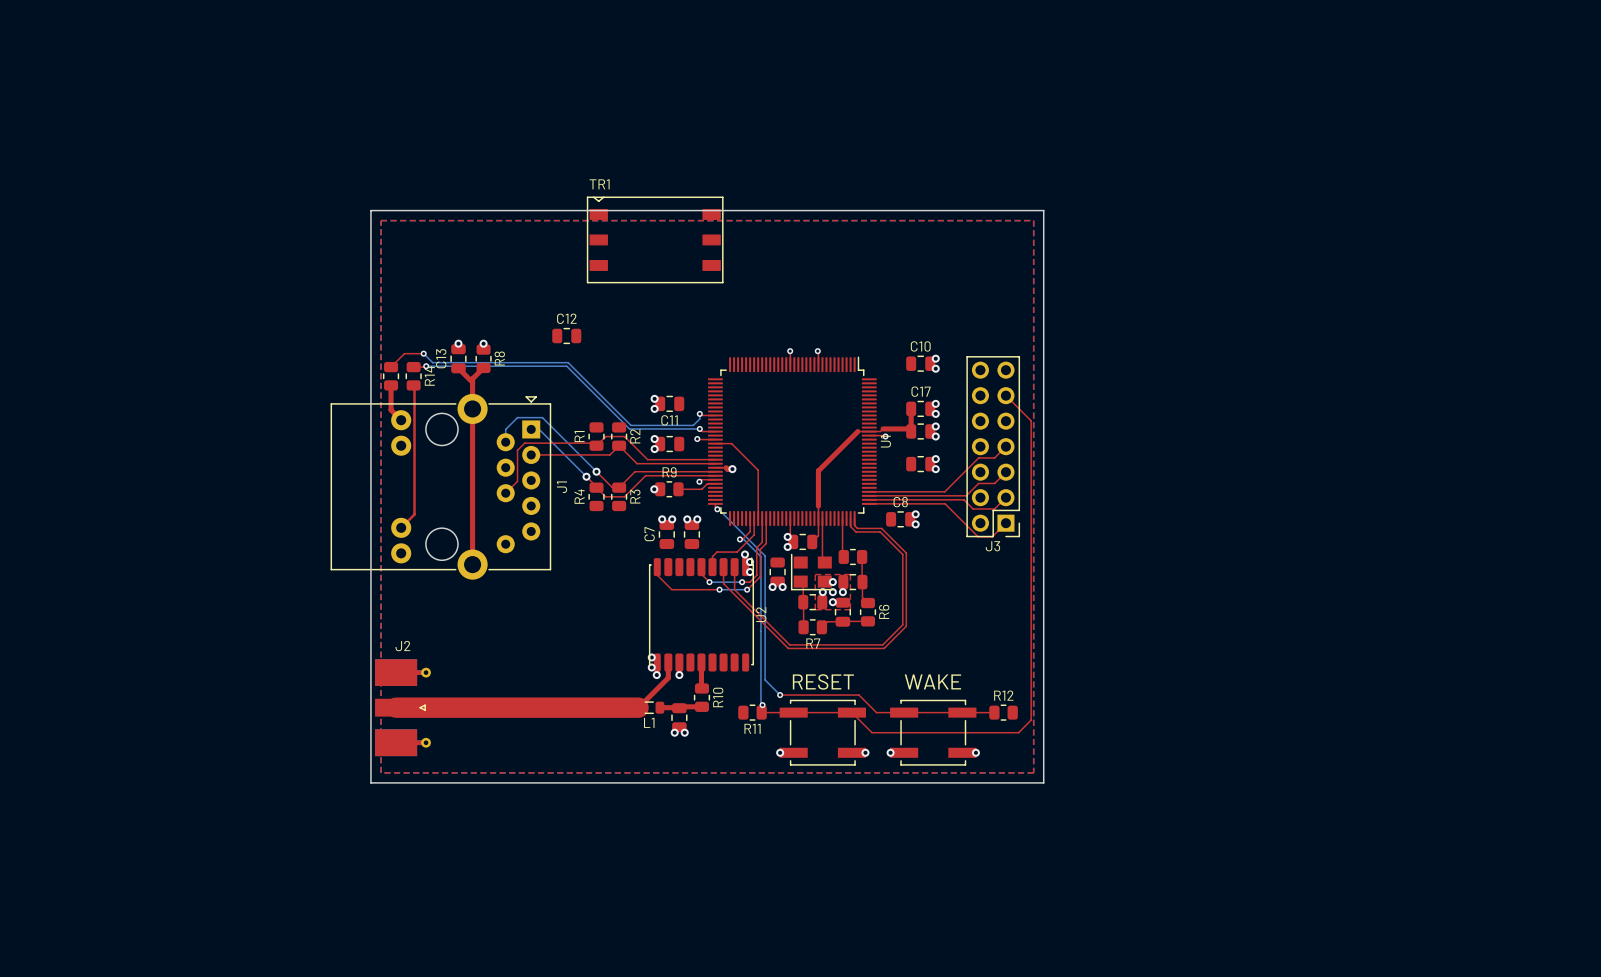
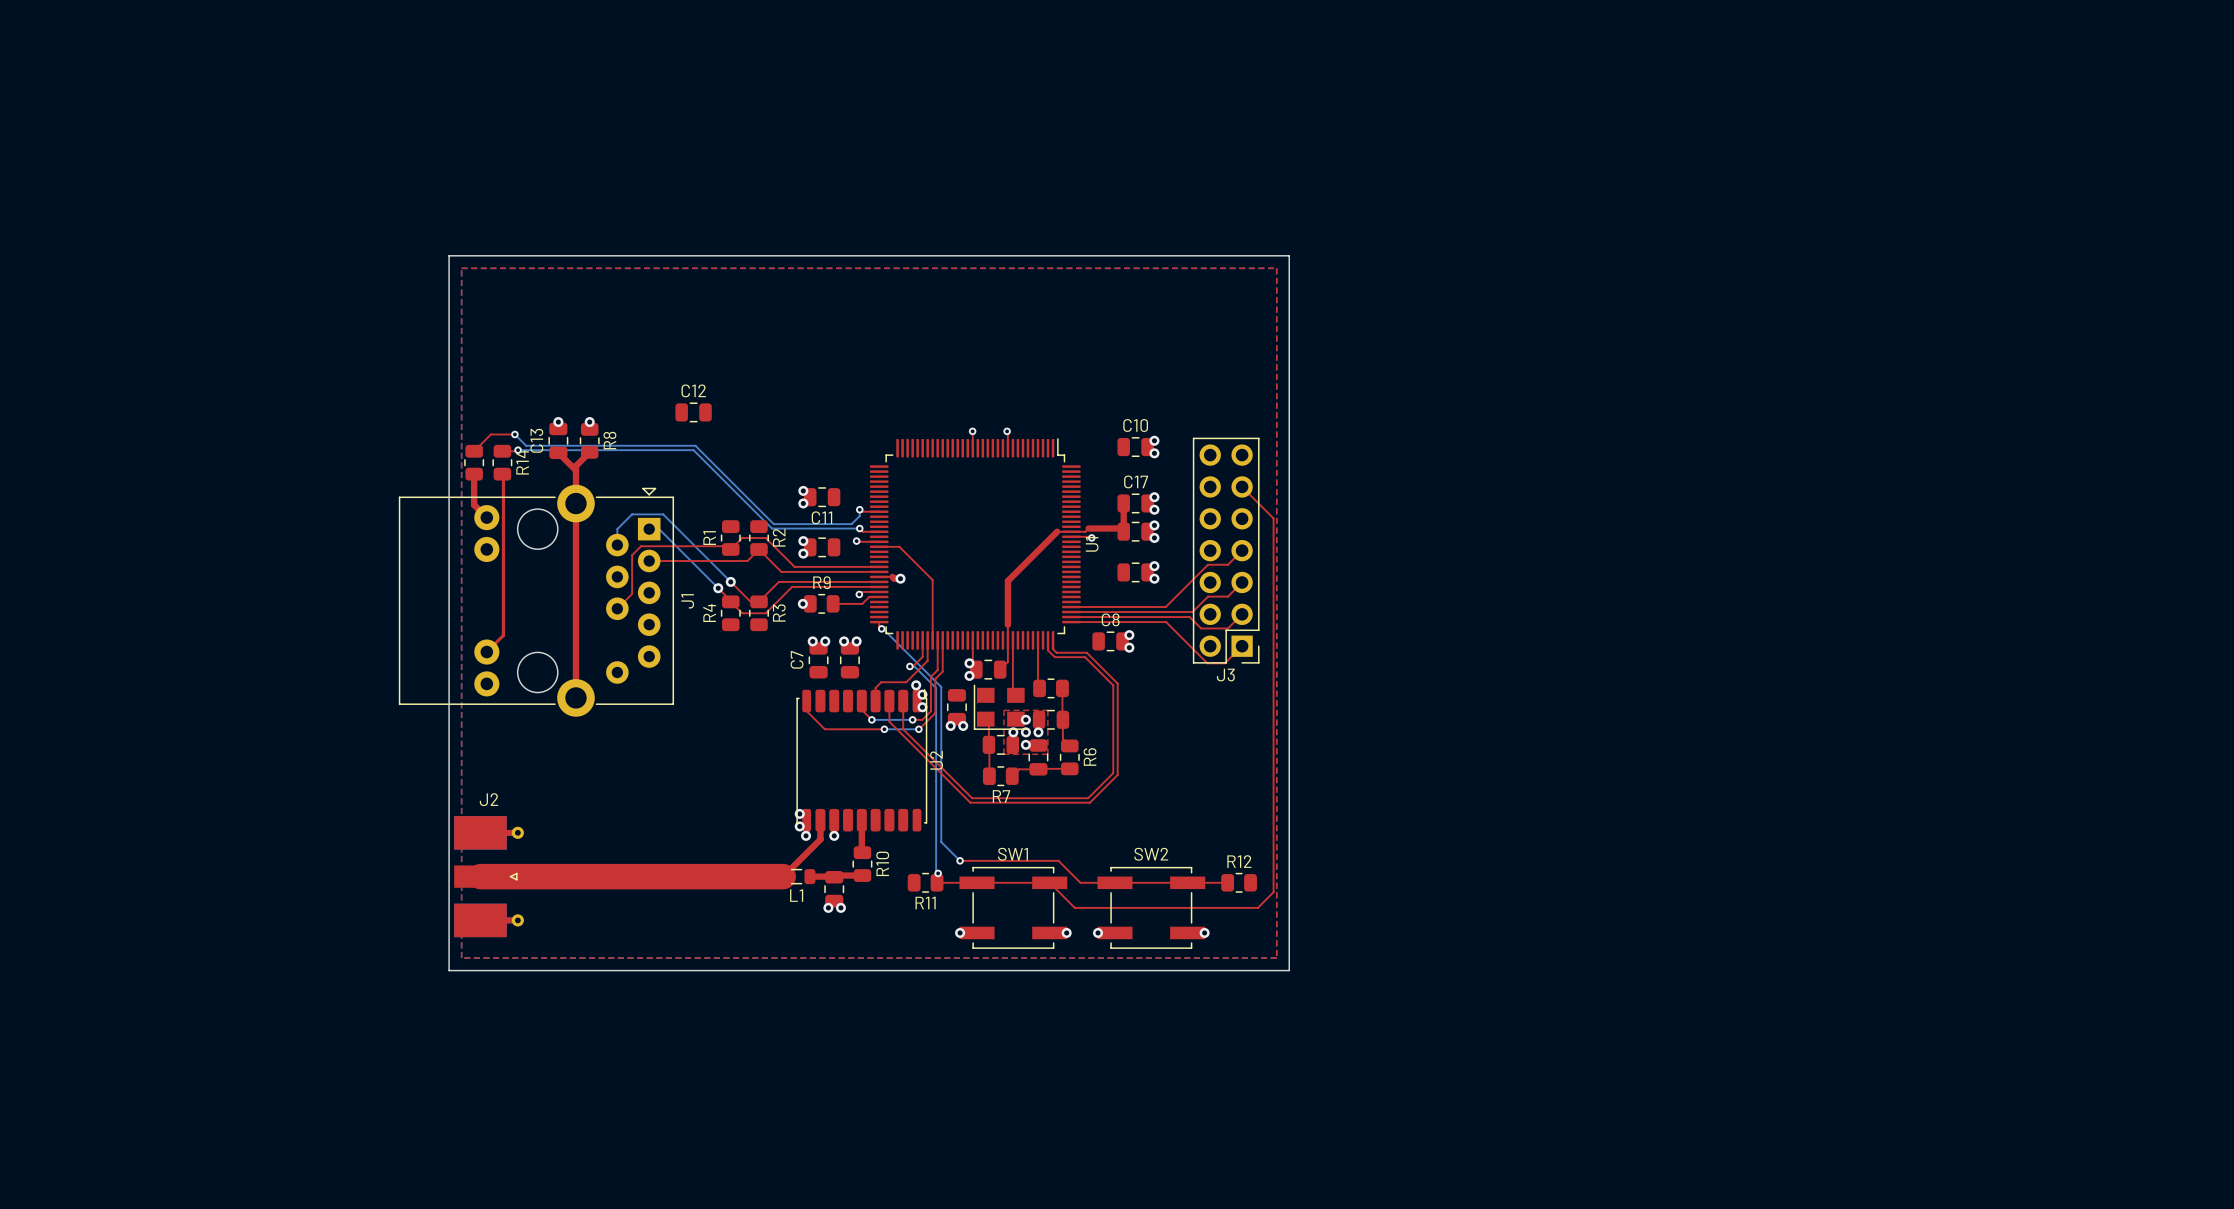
TR1: (655, 239) -> none
text: RESET (823, 681) -> none
text: WAKE (932, 681) -> none
SW1 name: none -> SW1 (1013, 854)
SW2 name: none -> SW2 (1151, 854)

